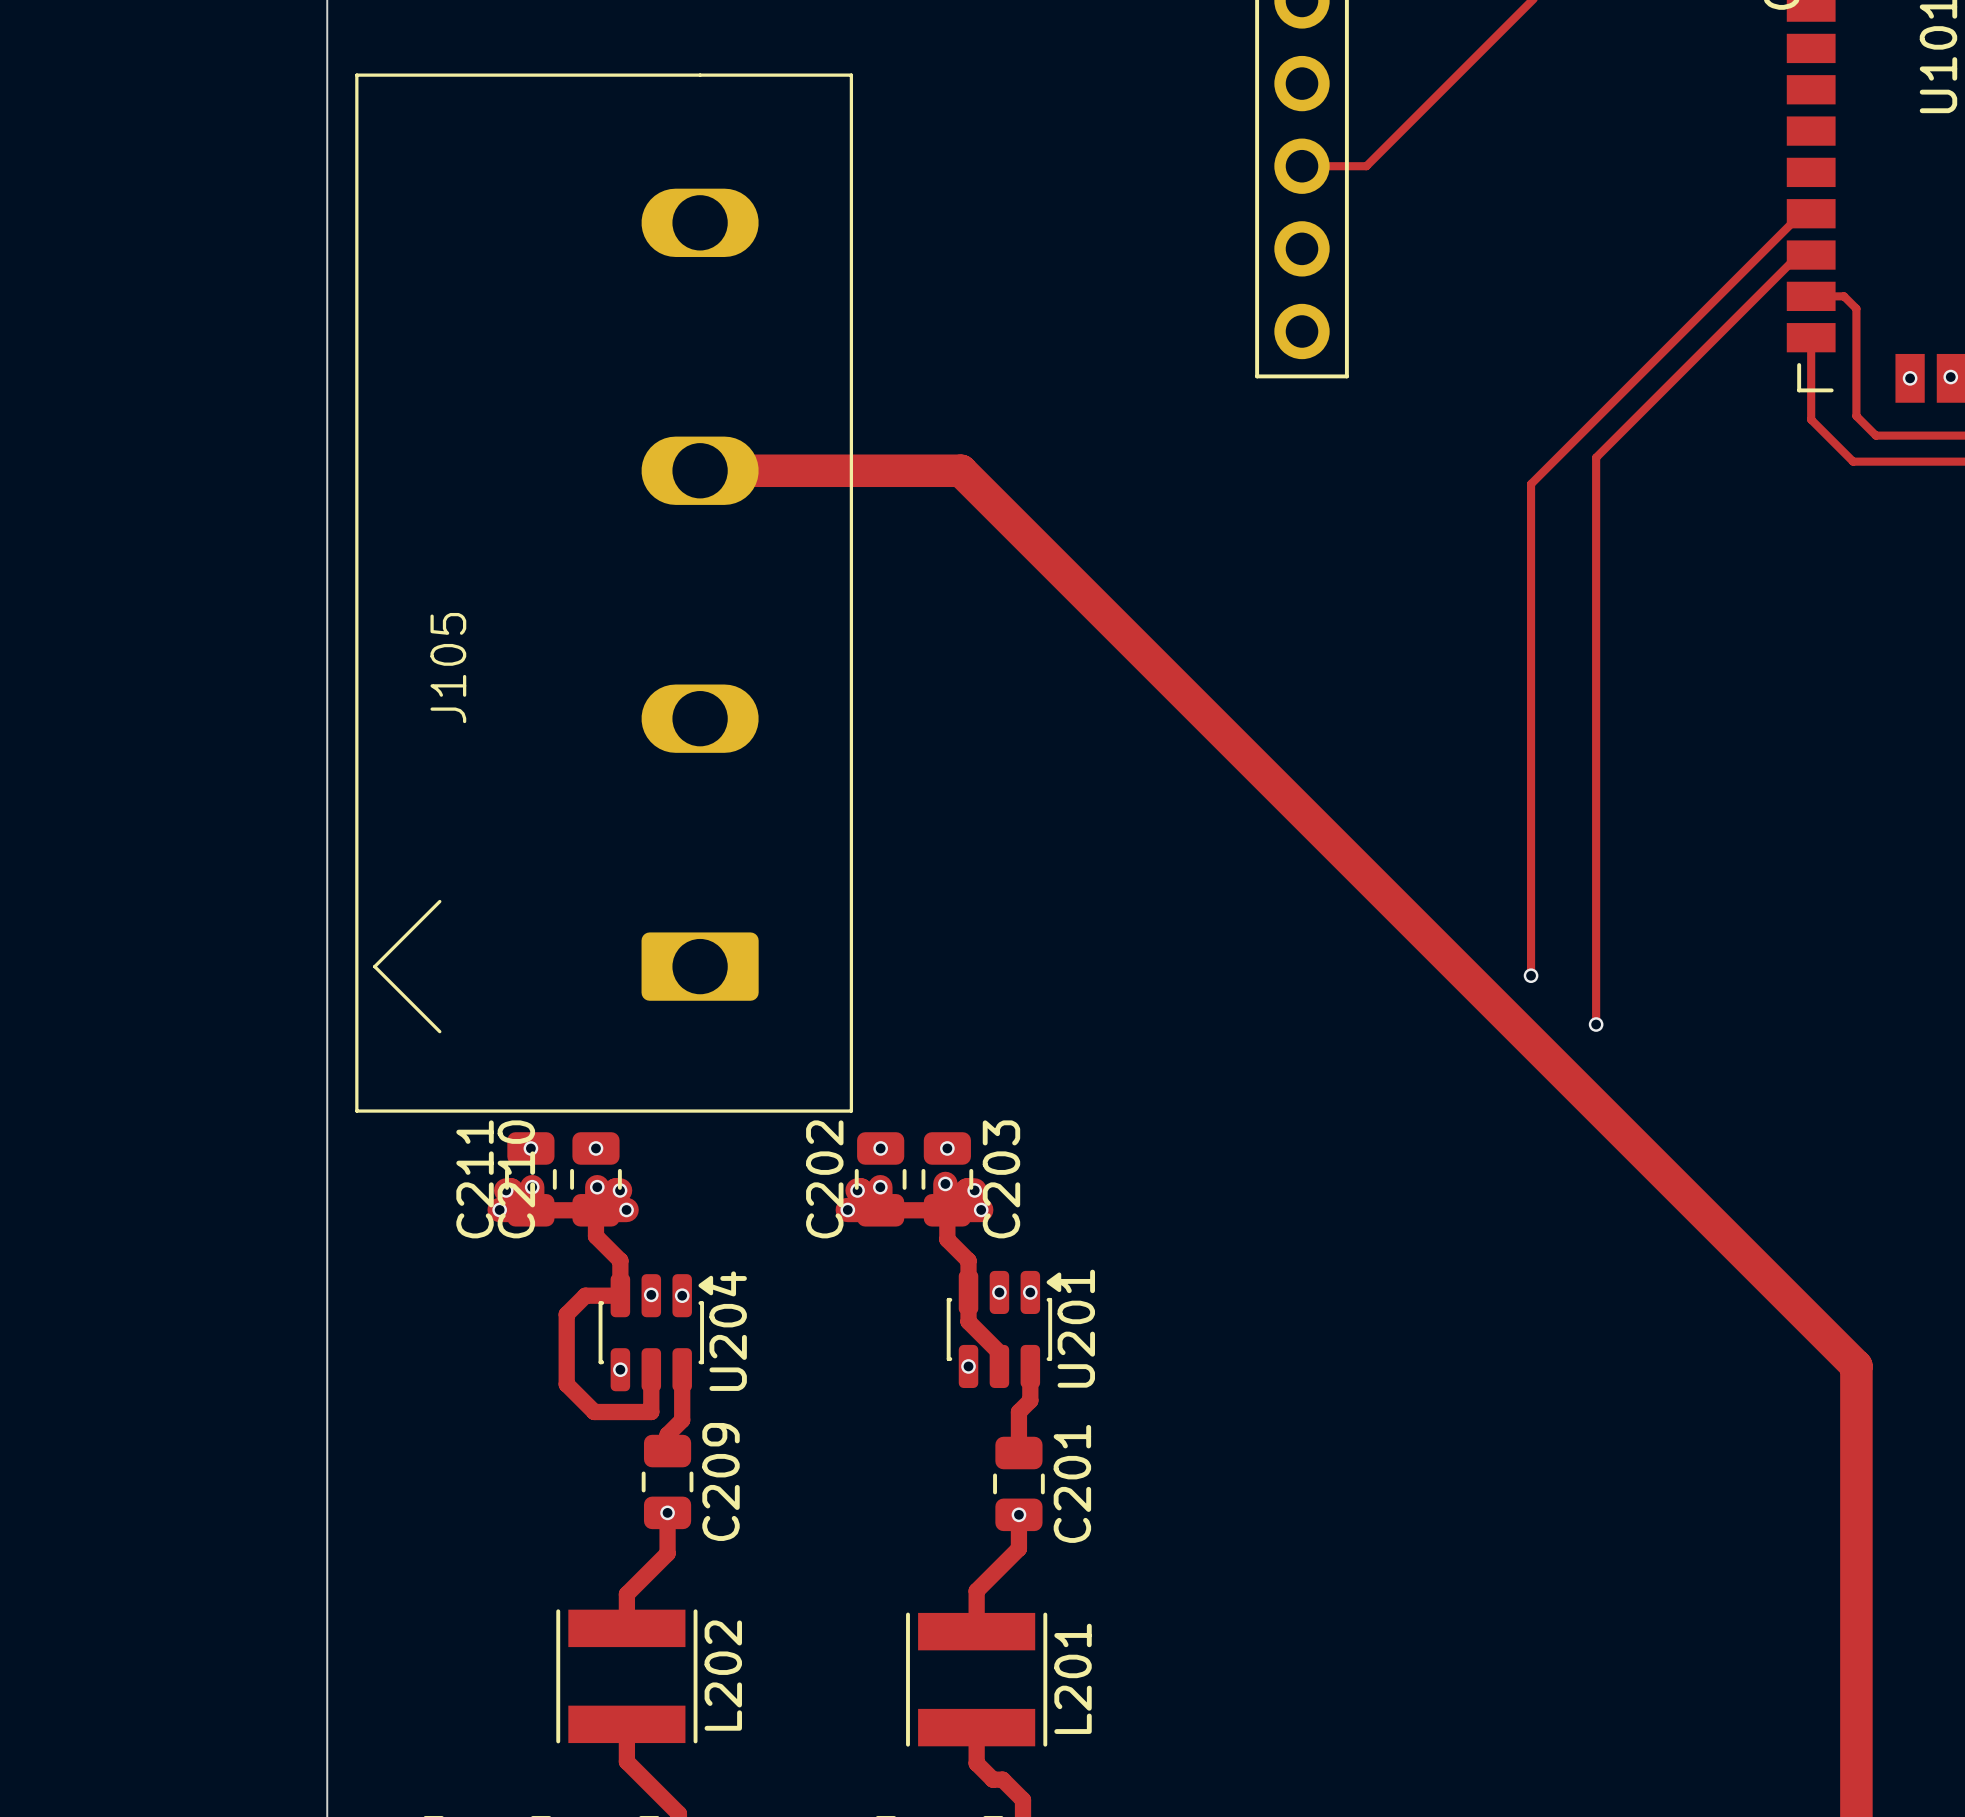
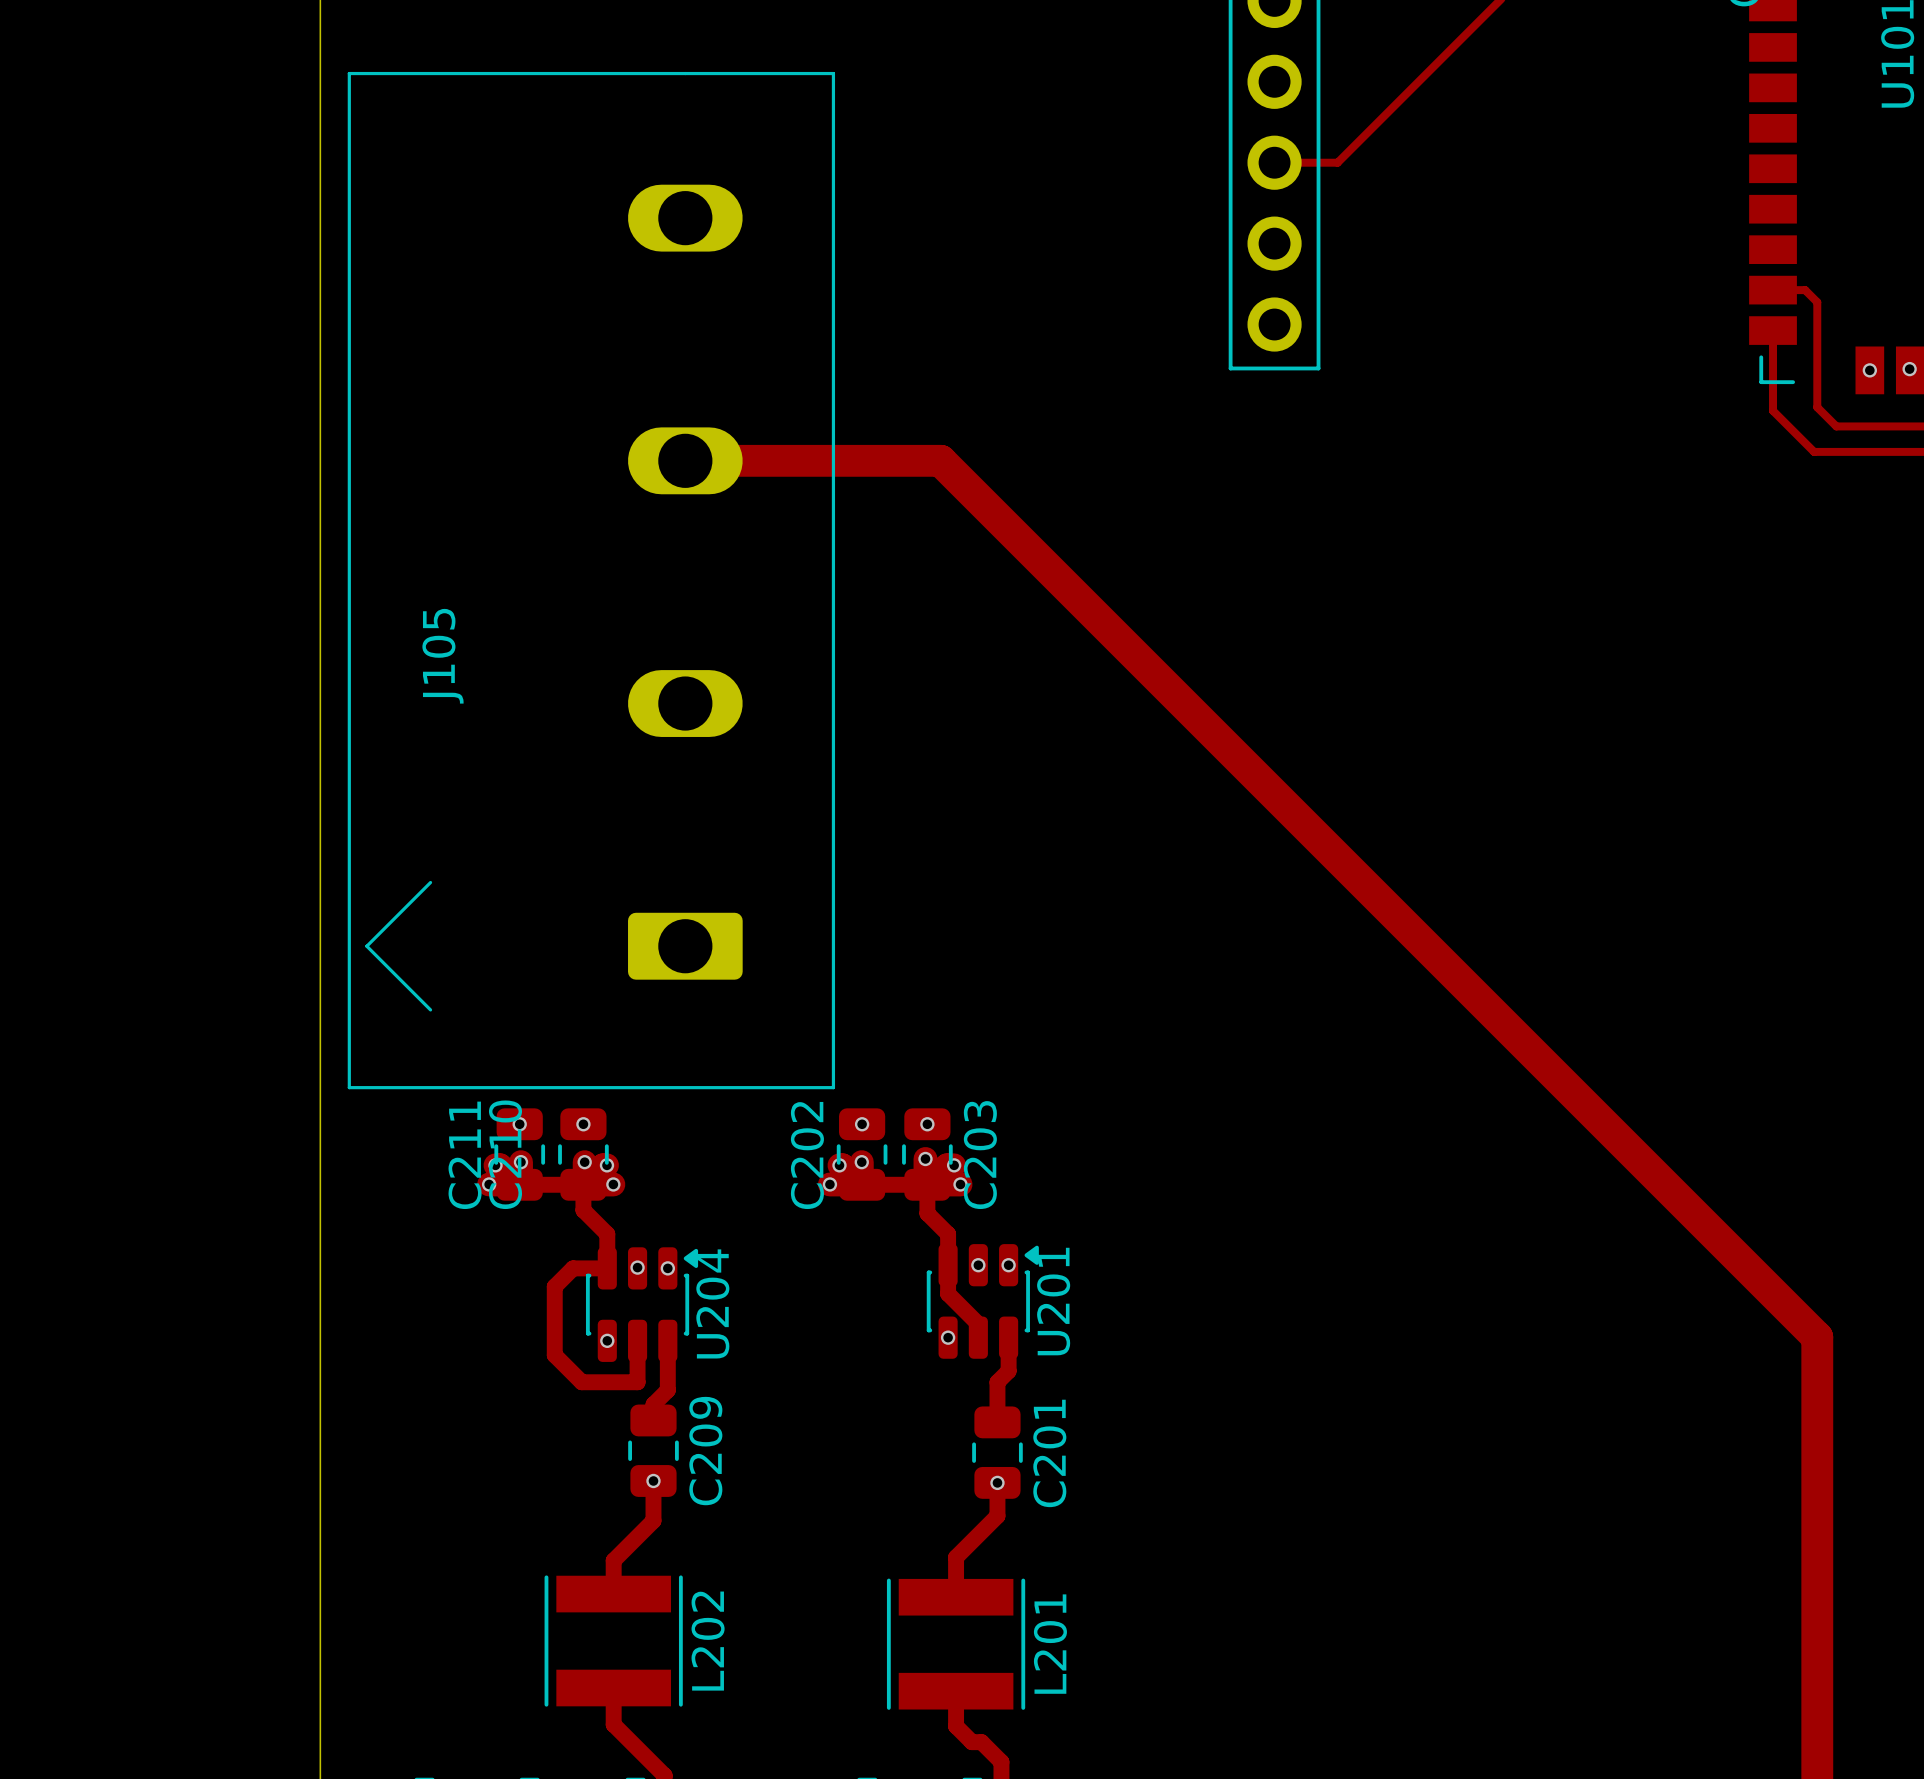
track: (1811, 213) (1801, 213) (1531, 484) (1531, 975) -> none
track: (1811, 255) (1798, 255) (1596, 457) (1596, 1024) -> none
via: (1531, 975) -> none
via: (1596, 1024) -> none

